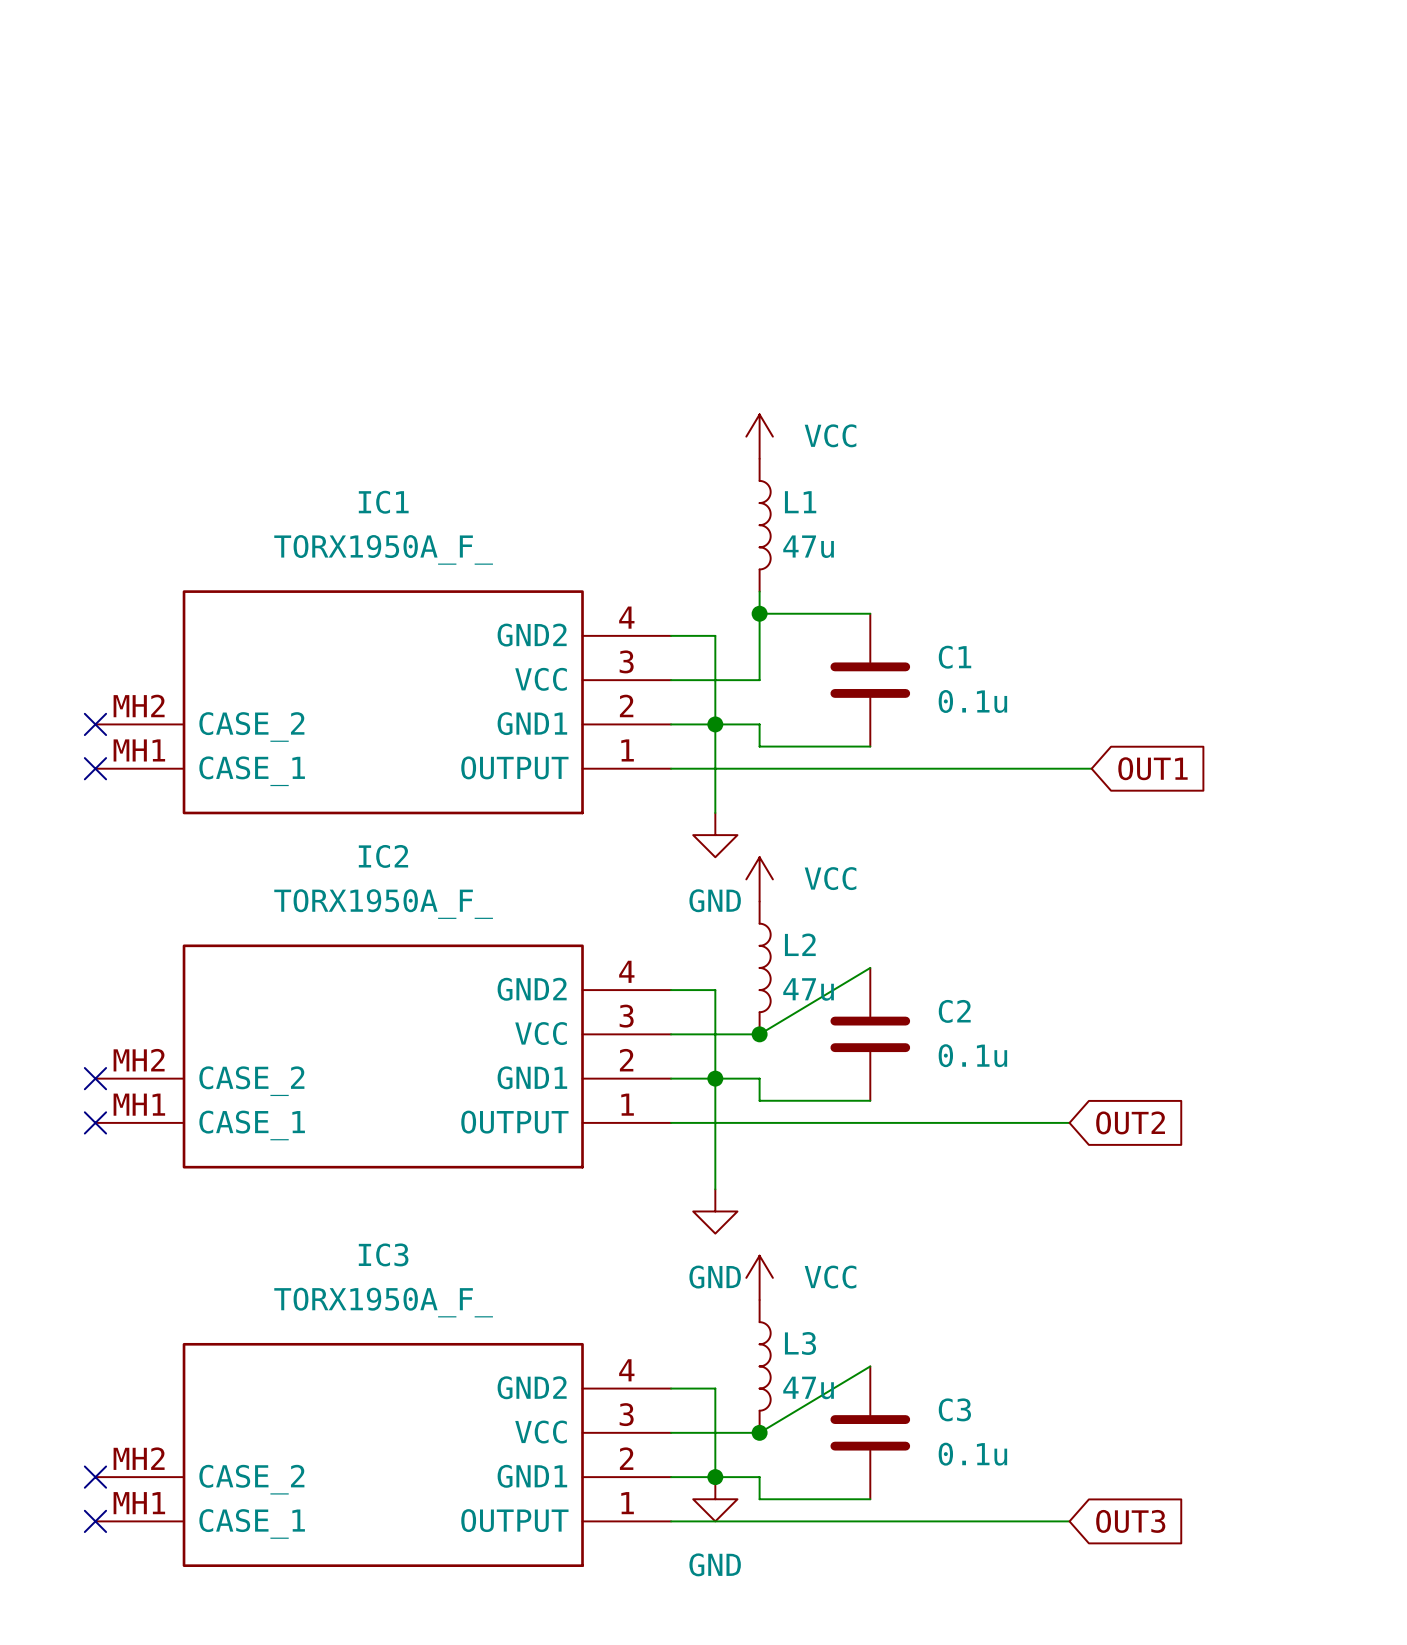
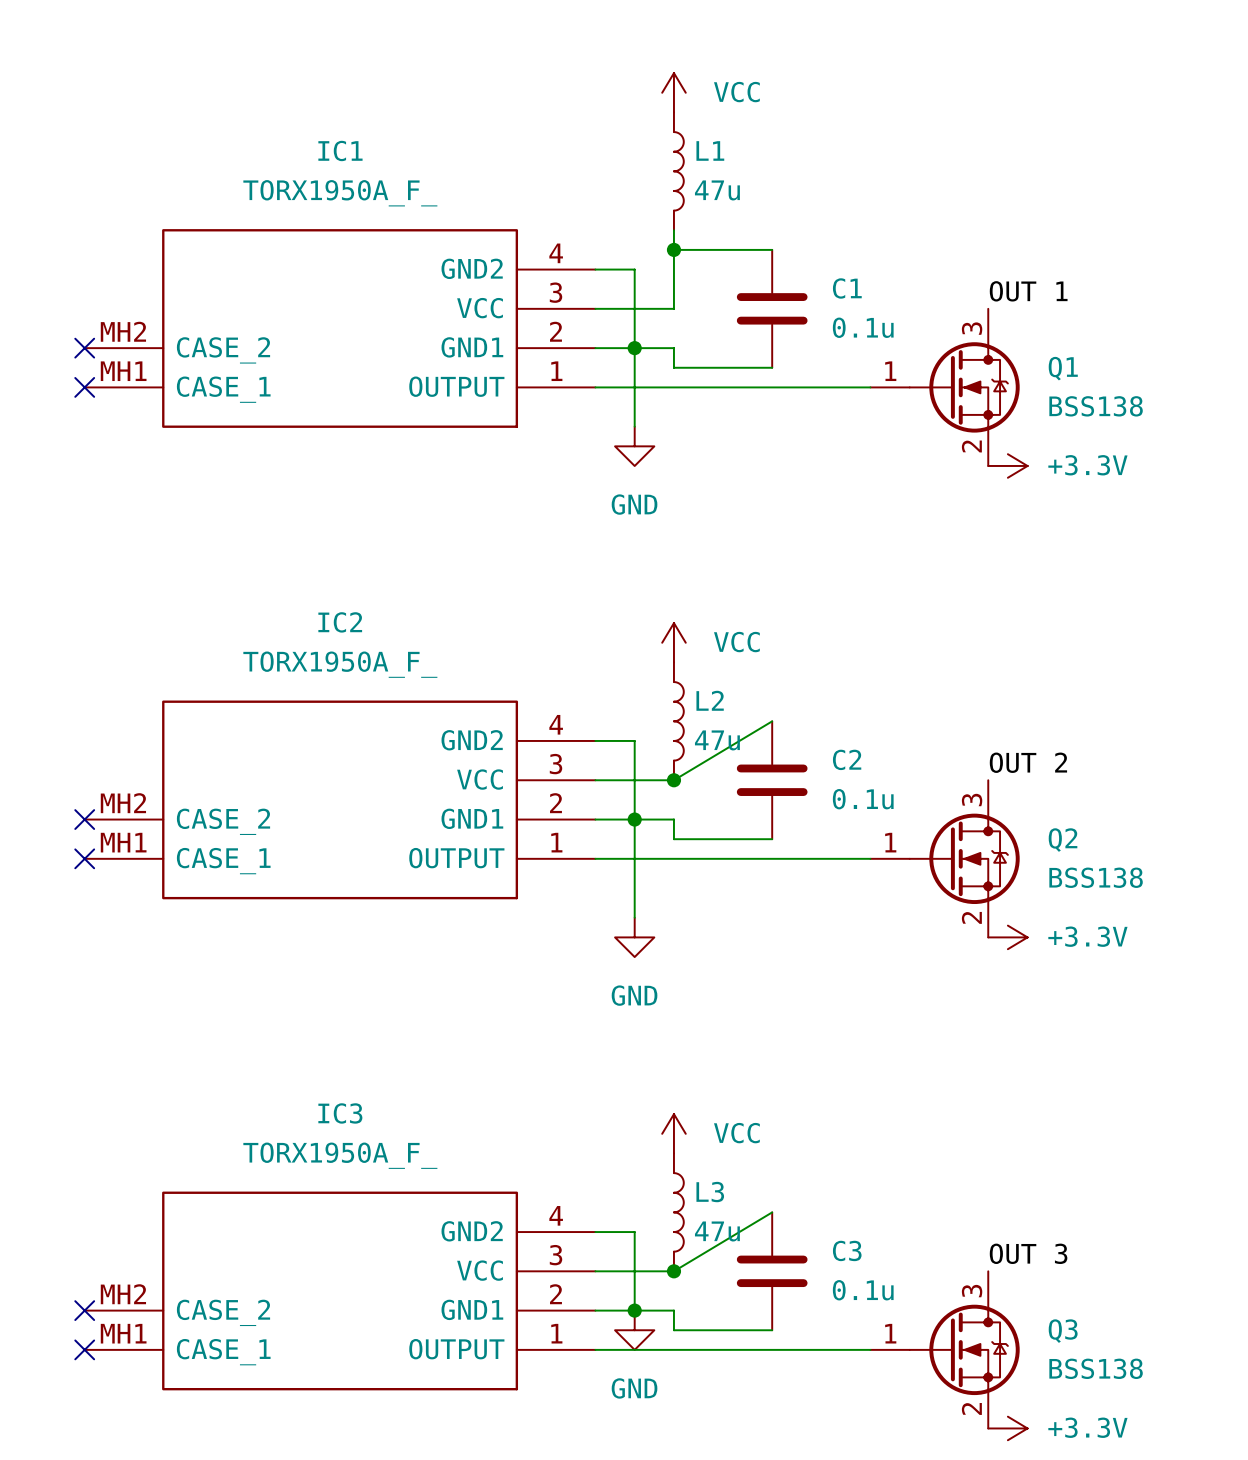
power symbol: none -> VCC (673, 92)
junction: none -> (673, 249)
label: none -> OUT 1 (1028, 291)
no-connect mark: none -> (84, 348)
junction: none -> (634, 348)
no-connect mark: none -> (84, 387)
wire: none -> (595, 387) (870, 387)
power symbol: VCC (759, 436) -> none
Q1: none -> BSS138 (945, 387)
power symbol: none -> GND (634, 446)
L1 position: (765, 525) -> (678, 171)
power symbol: none -> +3.3V (1007, 465)
wire: (759, 591) (759, 680) (671, 680) -> (673, 230) (673, 308) (595, 308)
wire: (759, 613) (870, 613) -> (673, 249) (772, 249)
junction: (759, 613) -> none
wire: (671, 635) (715, 635) (715, 812) -> (595, 269) (634, 269) (634, 426)
C1 position: (870, 680) -> (772, 308)
IC1 position: (383, 702) -> (340, 328)
no-connect mark: (95, 724) -> none
wire: (671, 724) (759, 724) (759, 746) (870, 746) -> (595, 348) (673, 348) (673, 367) (772, 367)
junction: (715, 724) -> none
power symbol: none -> VCC (673, 642)
no-connect mark: (95, 768) -> none
wire: (671, 768) (1091, 768) -> none
global label: OUT1 (1152, 768) -> none
power symbol: GND (715, 835) -> none
label: none -> OUT 2 (1028, 762)
junction: none -> (673, 780)
power symbol: VCC (759, 879) -> none
no-connect mark: none -> (84, 819)
junction: none -> (634, 819)
no-connect mark: none -> (84, 858)
wire: none -> (595, 858) (870, 858)
L2 position: (765, 967) -> (678, 721)
wire: (870, 967) (759, 1034) (671, 1034) -> (772, 721) (673, 780) (595, 780)
Q2: none -> BSS138 (945, 858)
wire: (671, 990) (715, 990) -> (595, 740) (634, 740) (634, 878)
wire: (715, 1034) (715, 1189) -> none
junction: (759, 1034) -> none
C2 position: (870, 1034) -> (772, 780)
IC2 position: (383, 1056) -> (340, 799)
power symbol: none -> GND (634, 937)
power symbol: none -> +3.3V (1007, 937)
no-connect mark: (95, 1078) -> none
wire: (671, 1078) (759, 1078) (759, 1100) (870, 1100) -> (595, 819) (673, 819) (673, 839) (772, 839)
junction: (715, 1078) -> none
no-connect mark: (95, 1122) -> none
wire: (671, 1122) (1069, 1122) -> none
global label: OUT2 (1130, 1122) -> none
power symbol: GND (715, 1211) -> none
label: none -> OUT 3 (1028, 1253)
Q3: none -> BSS138 (945, 1349)
global label: OUT3 (1130, 1521) -> none
power symbol: none -> +3.3V (1007, 1428)

